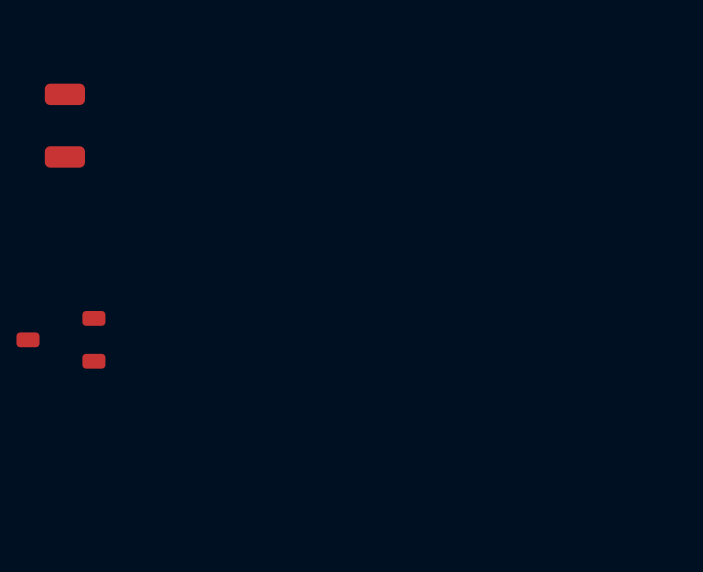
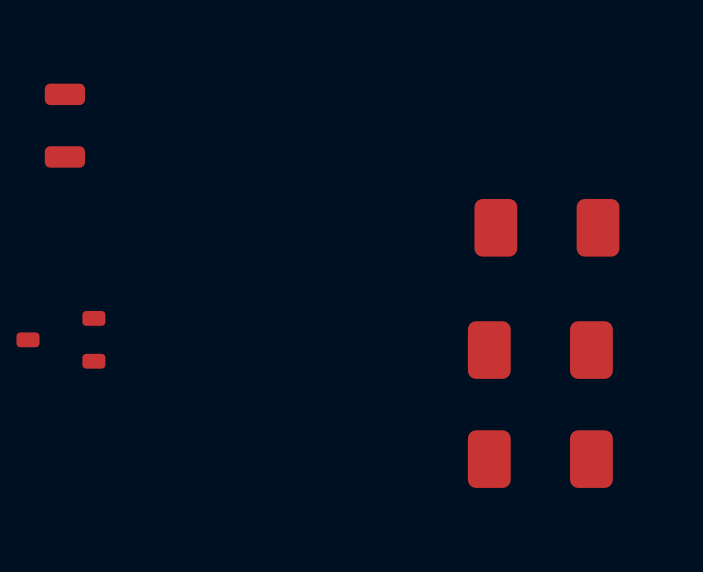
part: none -> (546, 227)
part: none -> (540, 350)
part: none -> (540, 459)

